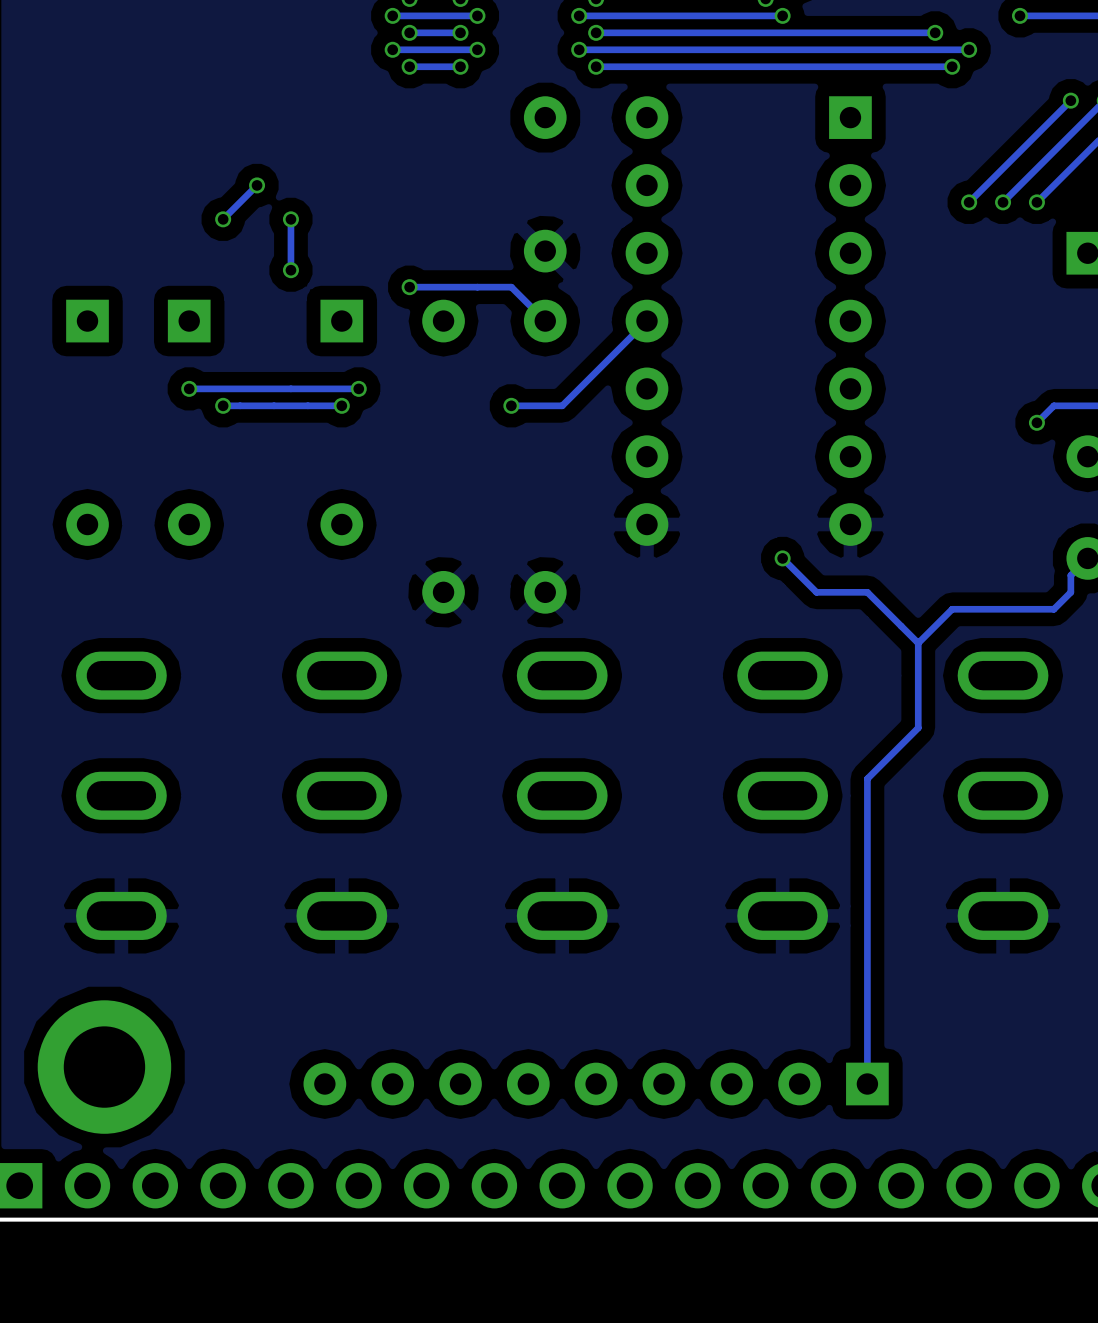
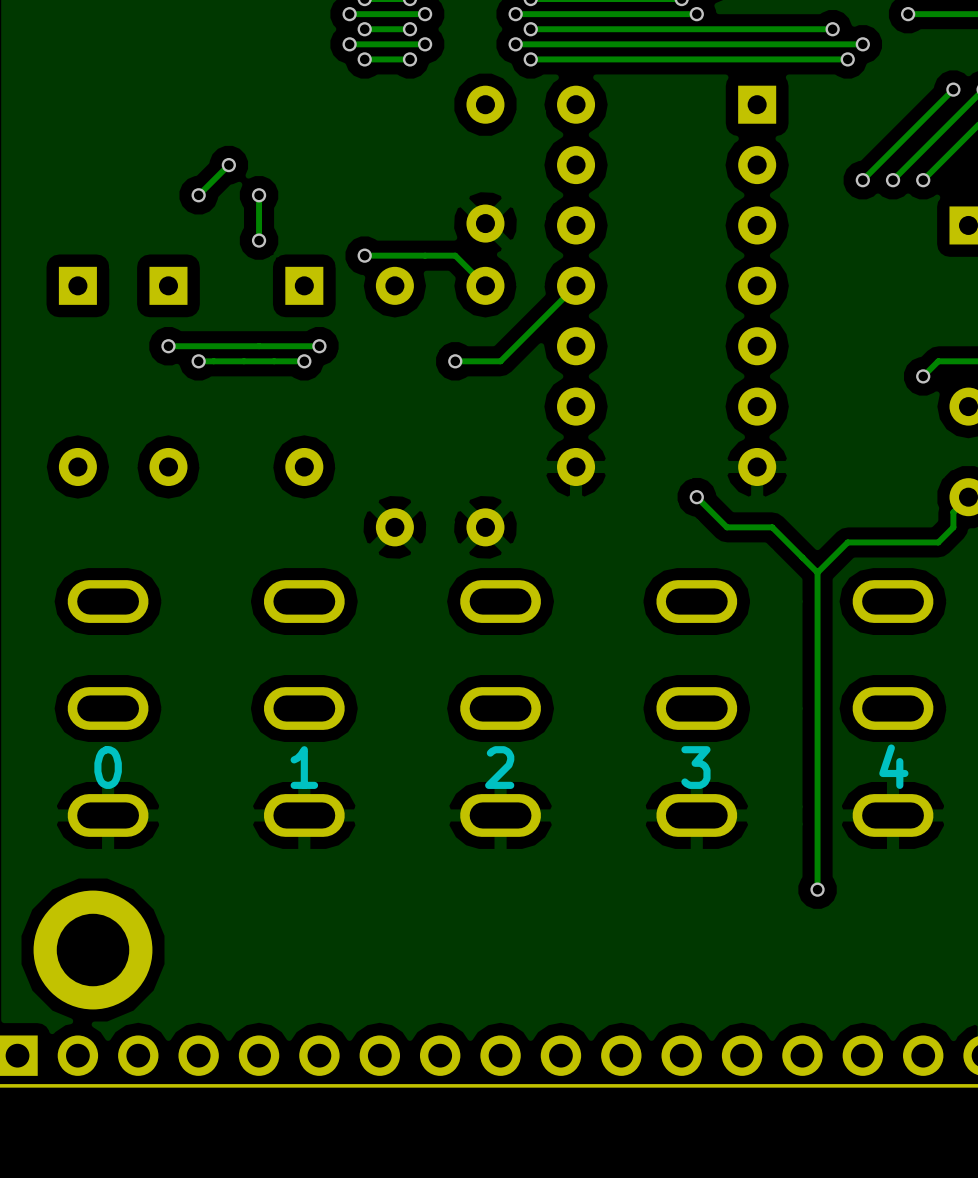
track: (918, 727) (867, 778) (867, 1084) -> (817, 648) (817, 889)
text: none -> 2 (499, 767)
text: none -> 0 (108, 767)
text: none -> 1 (304, 767)
text: none -> 3 (695, 767)
text: none -> 4 (893, 766)
via: none -> (817, 889)
part: (596, 1084) -> none

